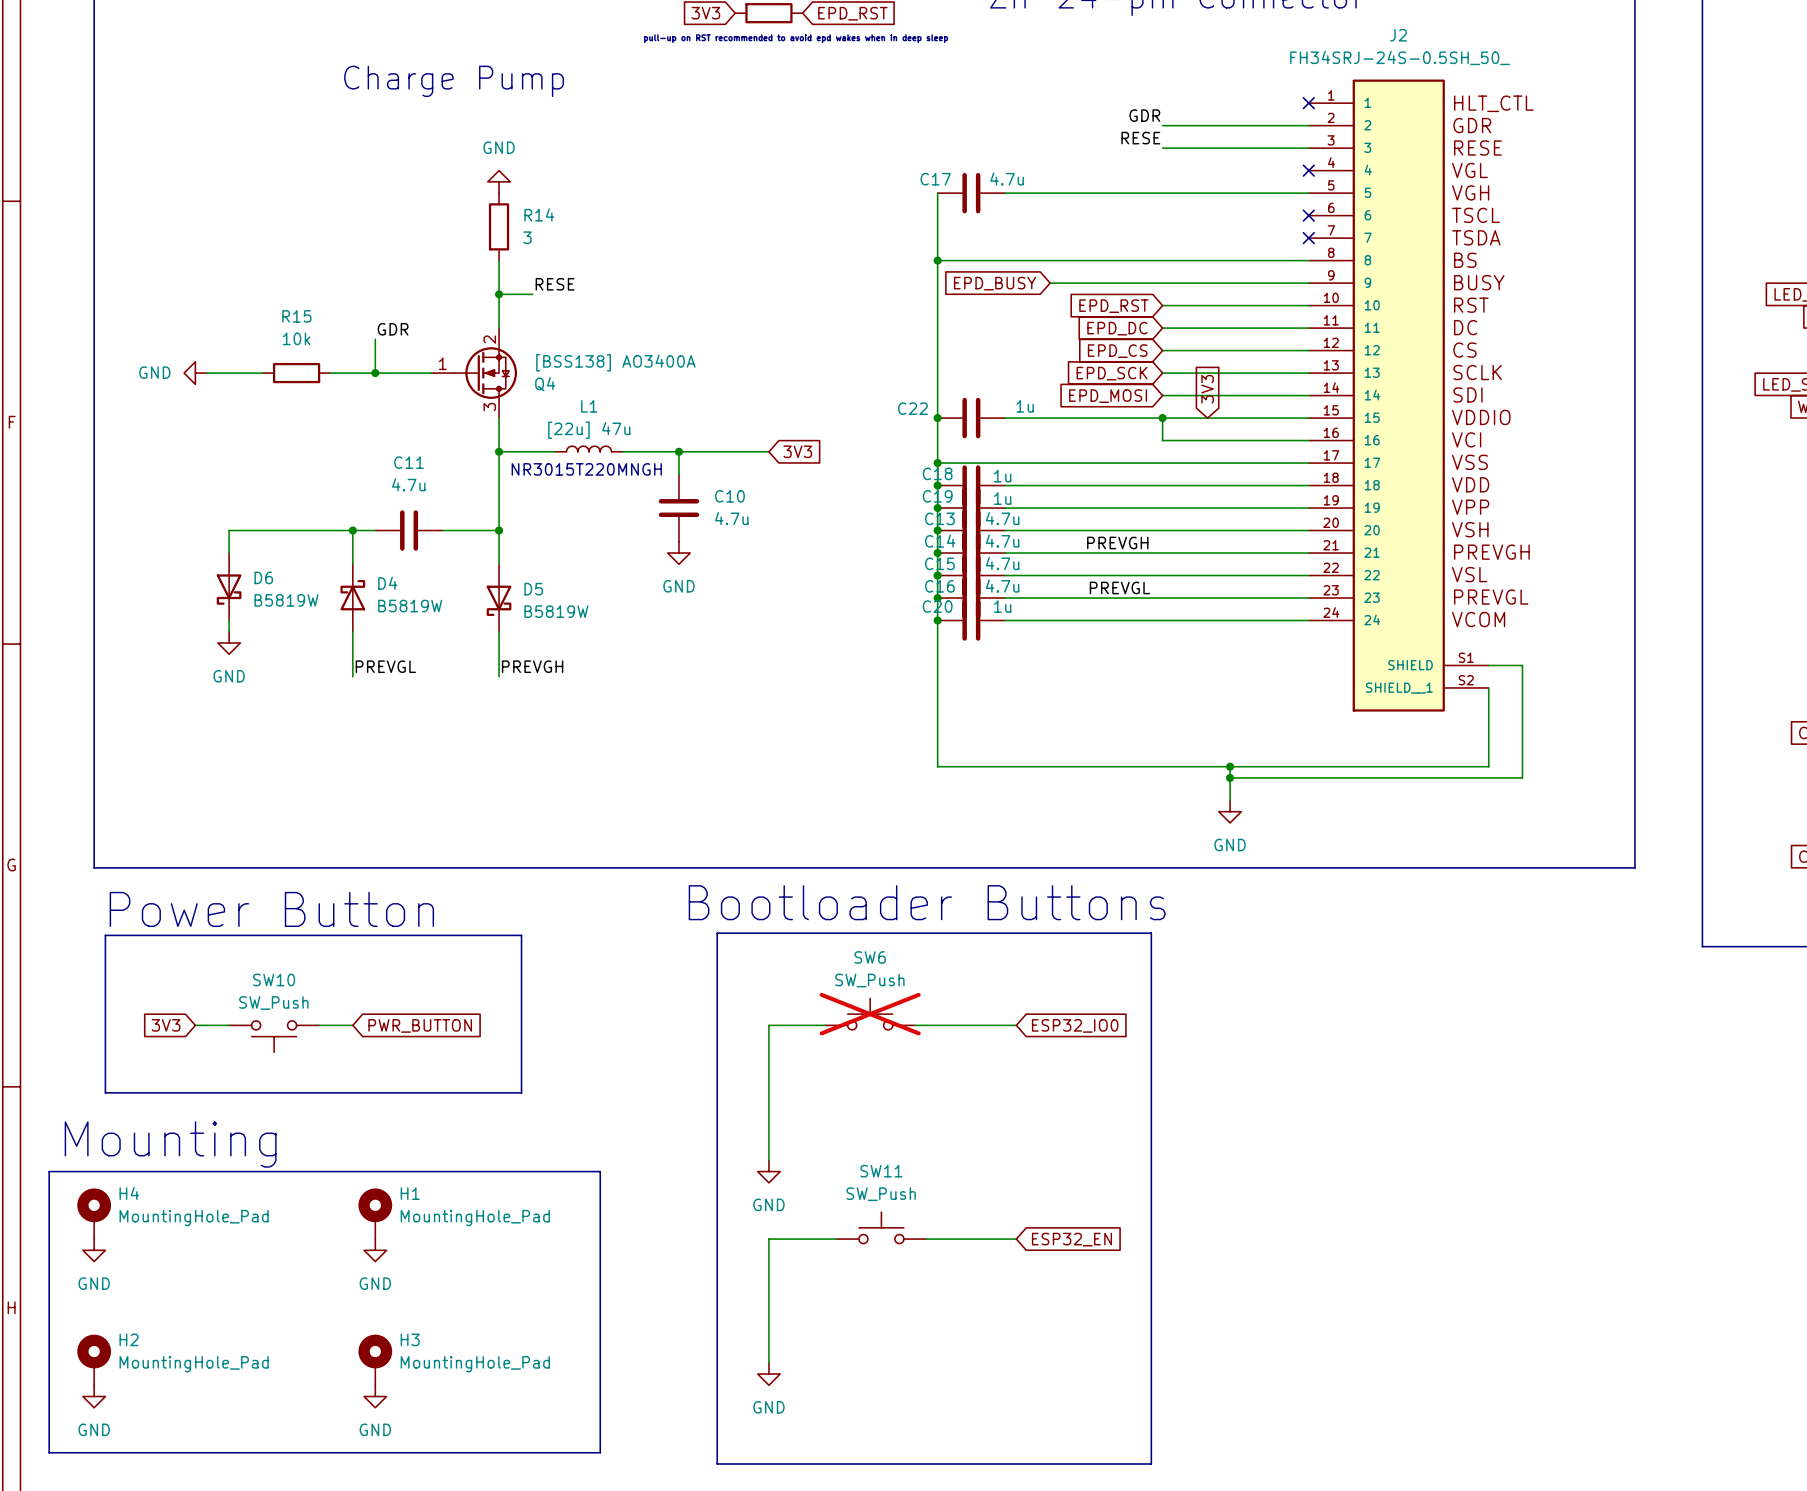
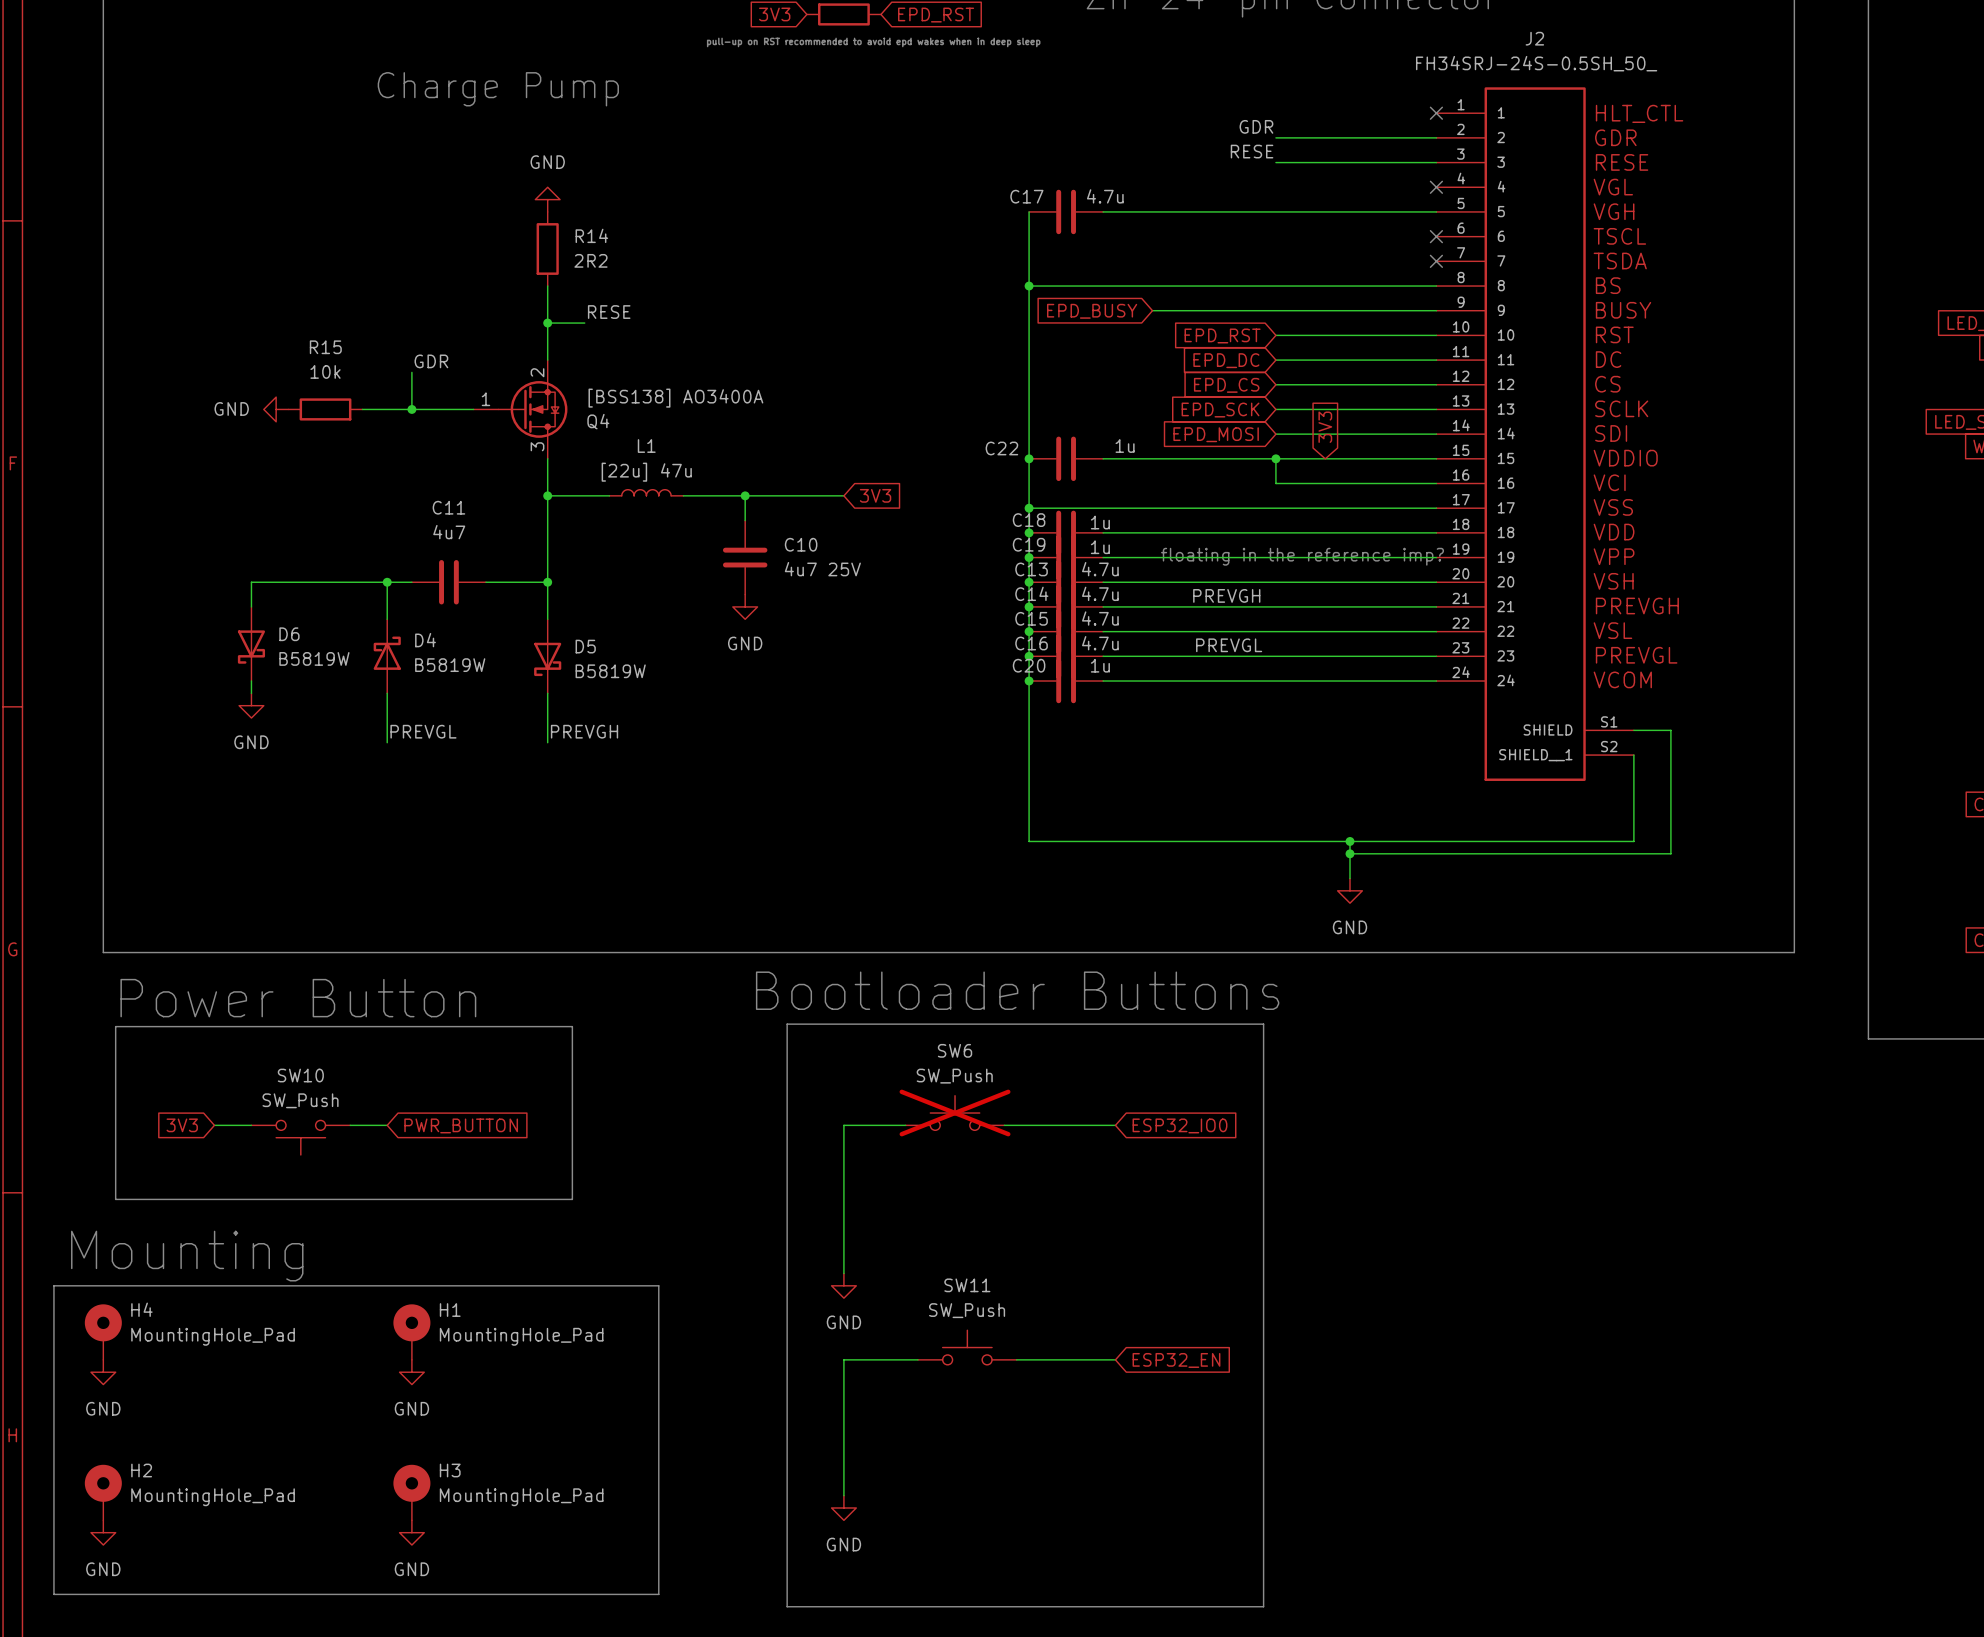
R14 value: 3 (527, 237) -> 2R2 (590, 260)
power symbol position: GND (195, 373) -> GND (276, 409)
wire: (206, 373) (262, 373) -> none
text: NR3015T220MNGH (586, 469) -> none
C11 value: 4.7u (408, 484) -> 4u7 (449, 532)
text: none -> floating in the reference imp? (1302, 556)
C10 value: 4.7u (731, 518) -> 4u7 25V (822, 569)

